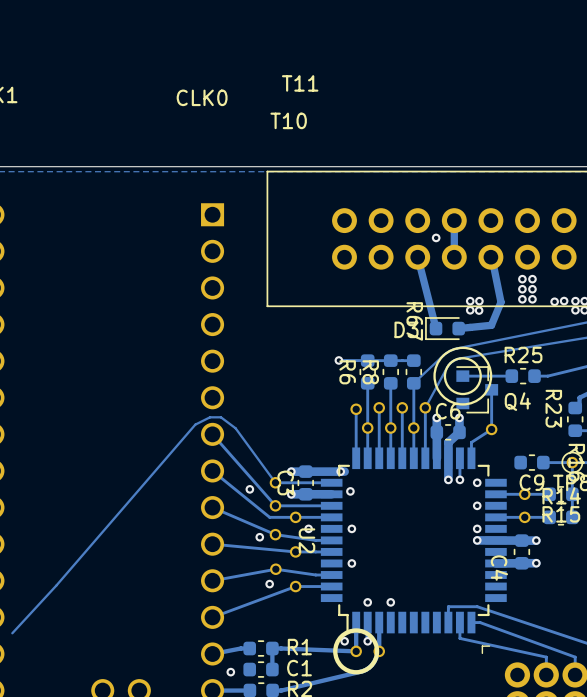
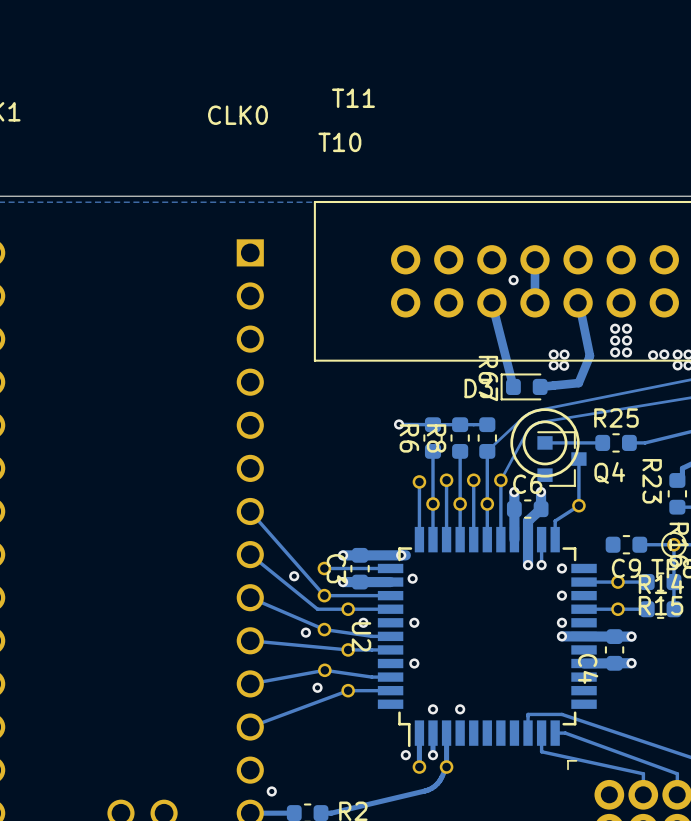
track: (275, 482) (235, 428) (220, 417) (209, 417) (195, 424) (56, 585) (12, 633) -> none
drawing: [333, 628, 380, 675] -> none
track: (249, 648) (212, 653) -> none
R1: (261, 648) -> none
track: (356, 651) (272, 648) (272, 669) -> none
C1: (261, 669) -> none

